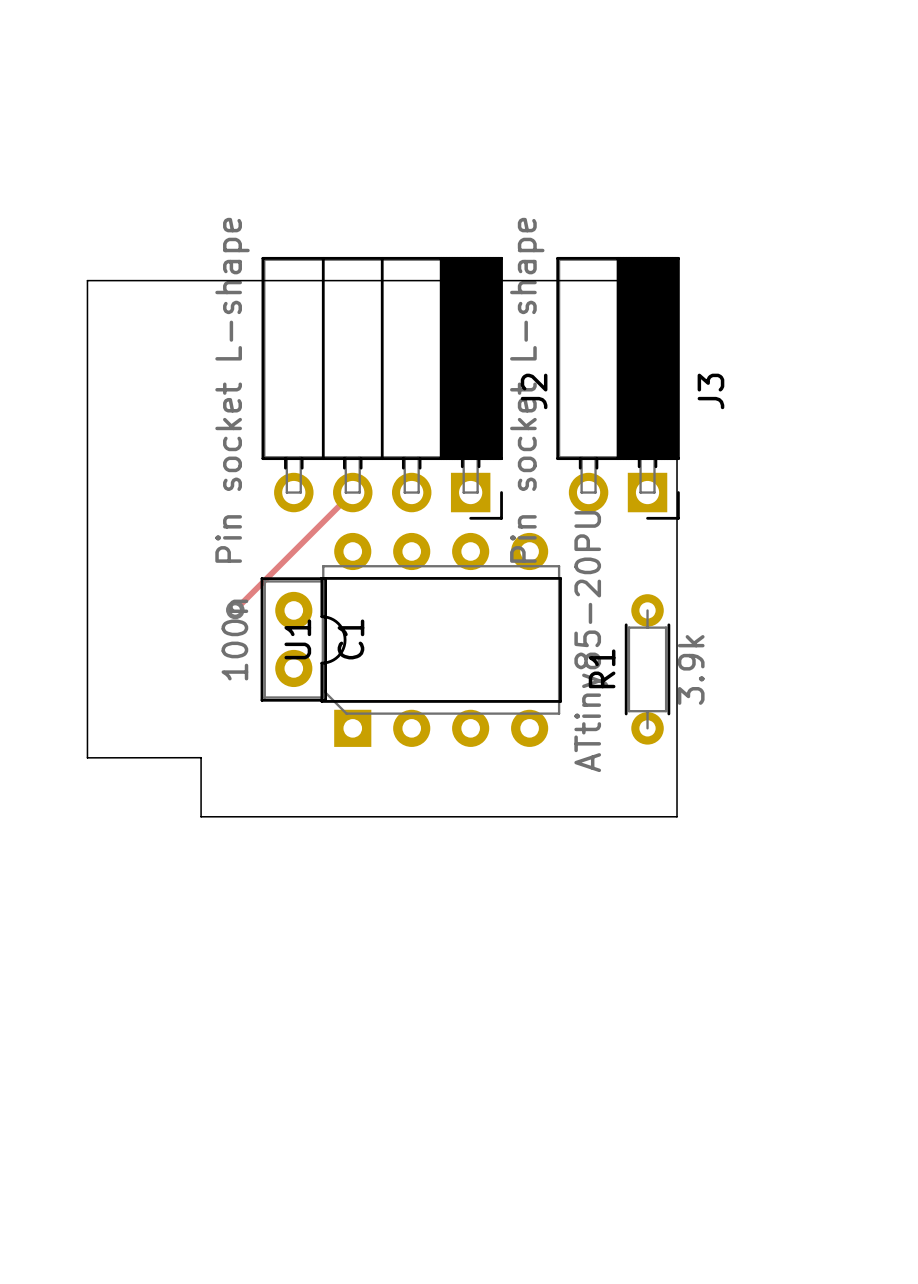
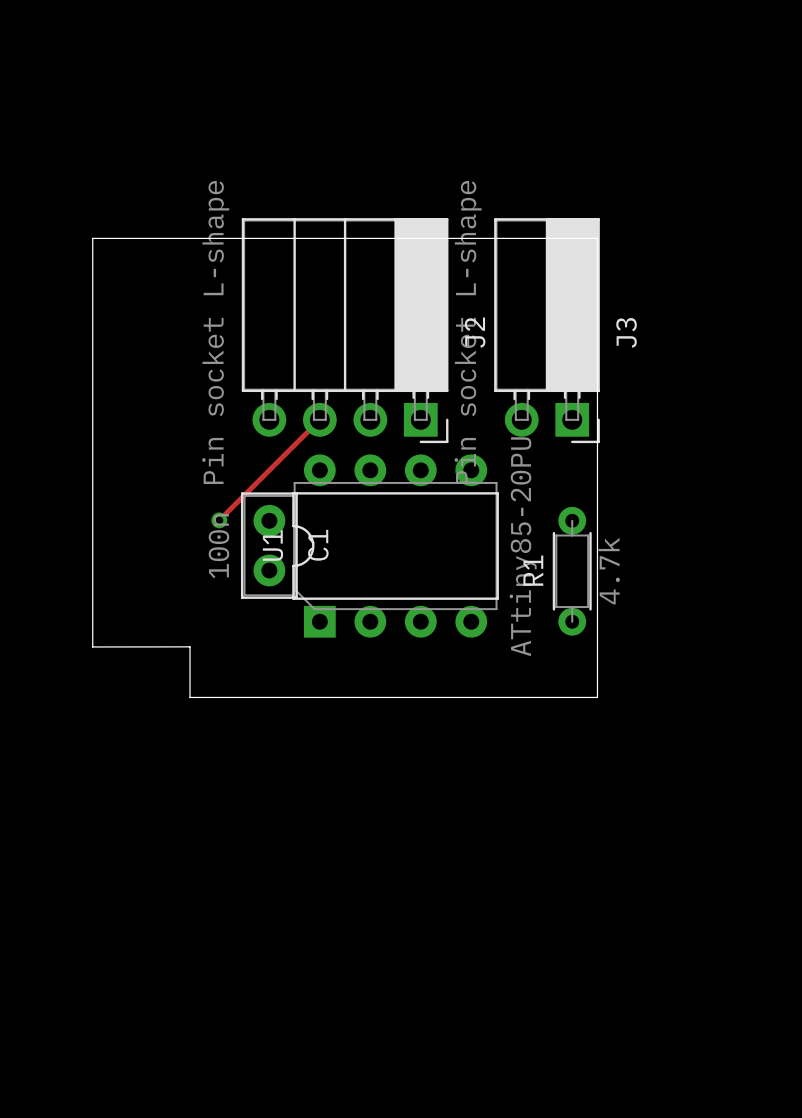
R1 value: 3.9k (691, 669) -> 4.7k (609, 571)

